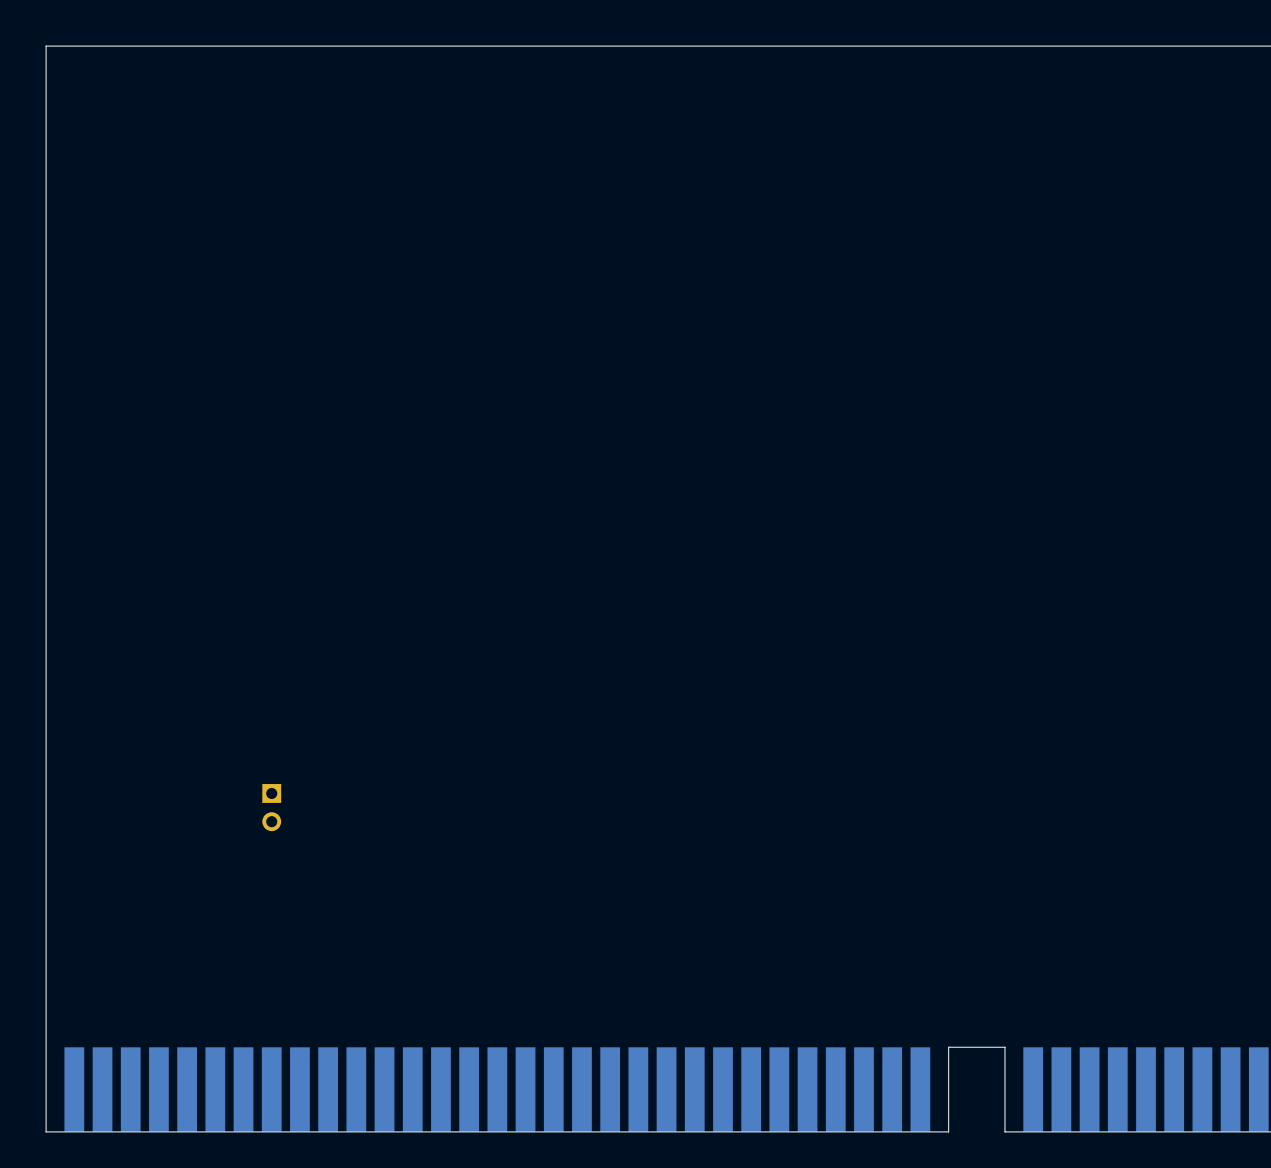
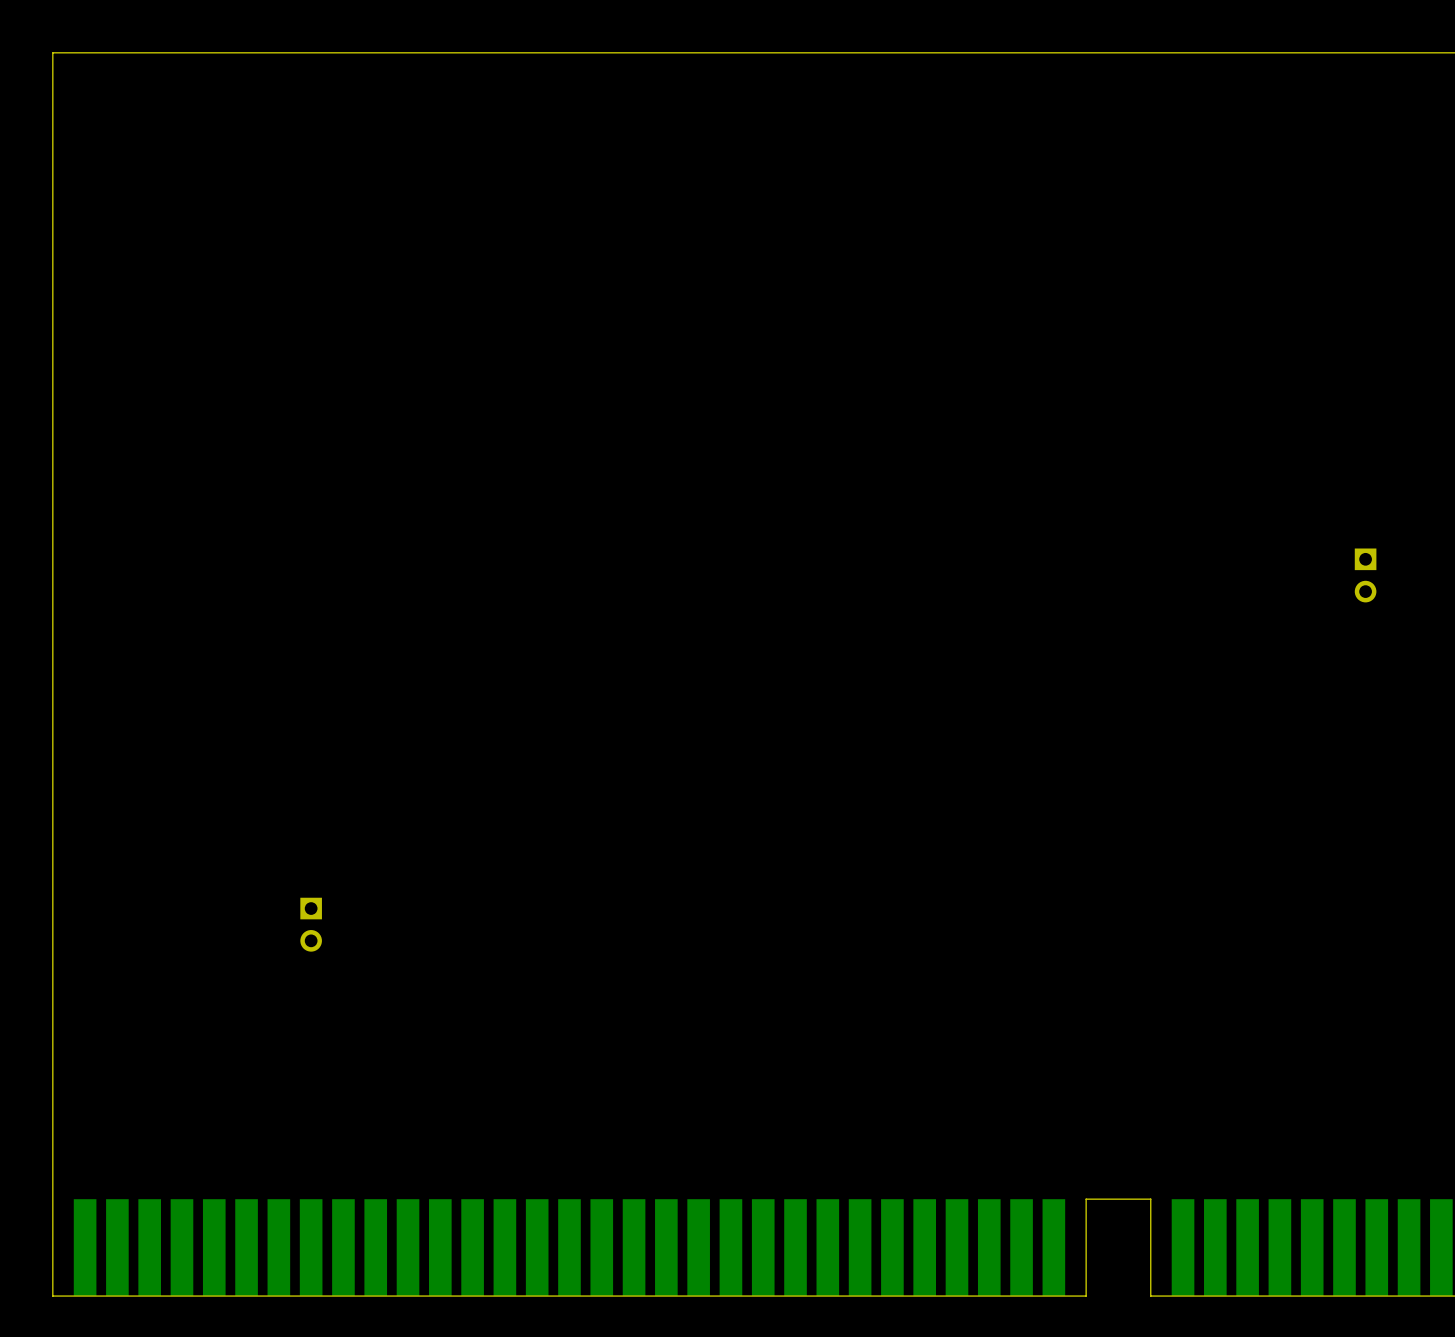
part: none -> (1365, 575)

